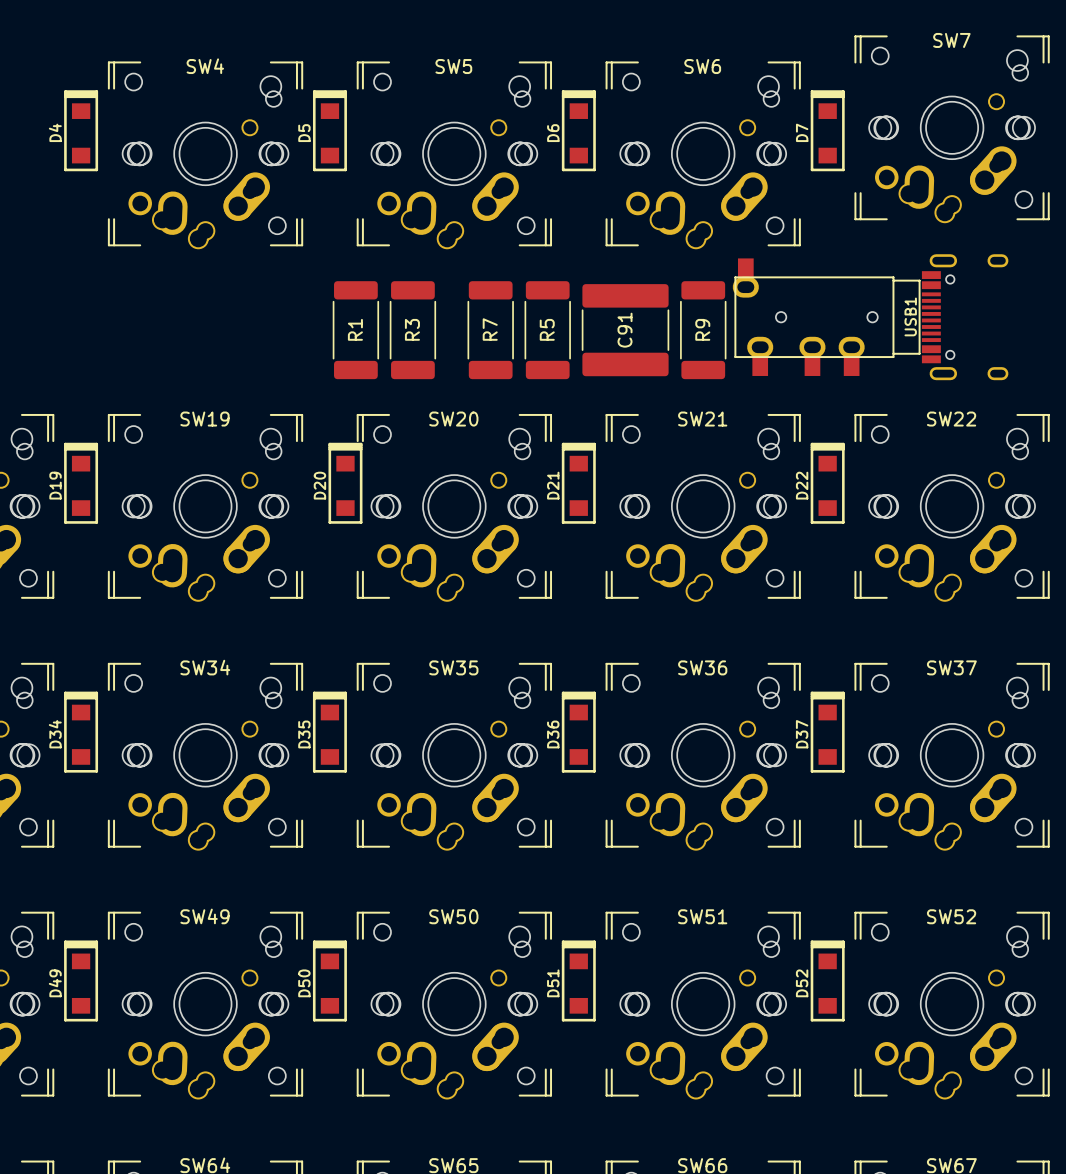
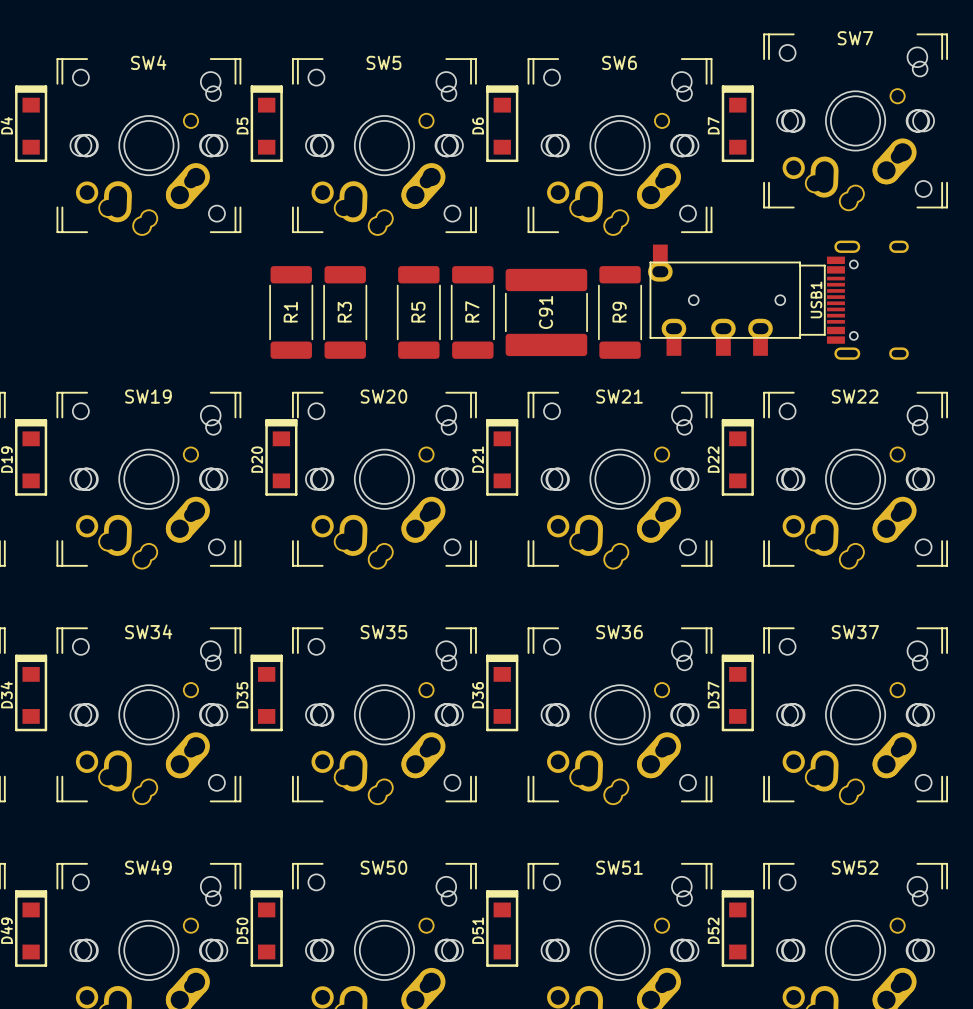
R7 name: R7 (490, 329) -> R5 (418, 312)
R5 name: R5 (547, 329) -> R7 (472, 311)

